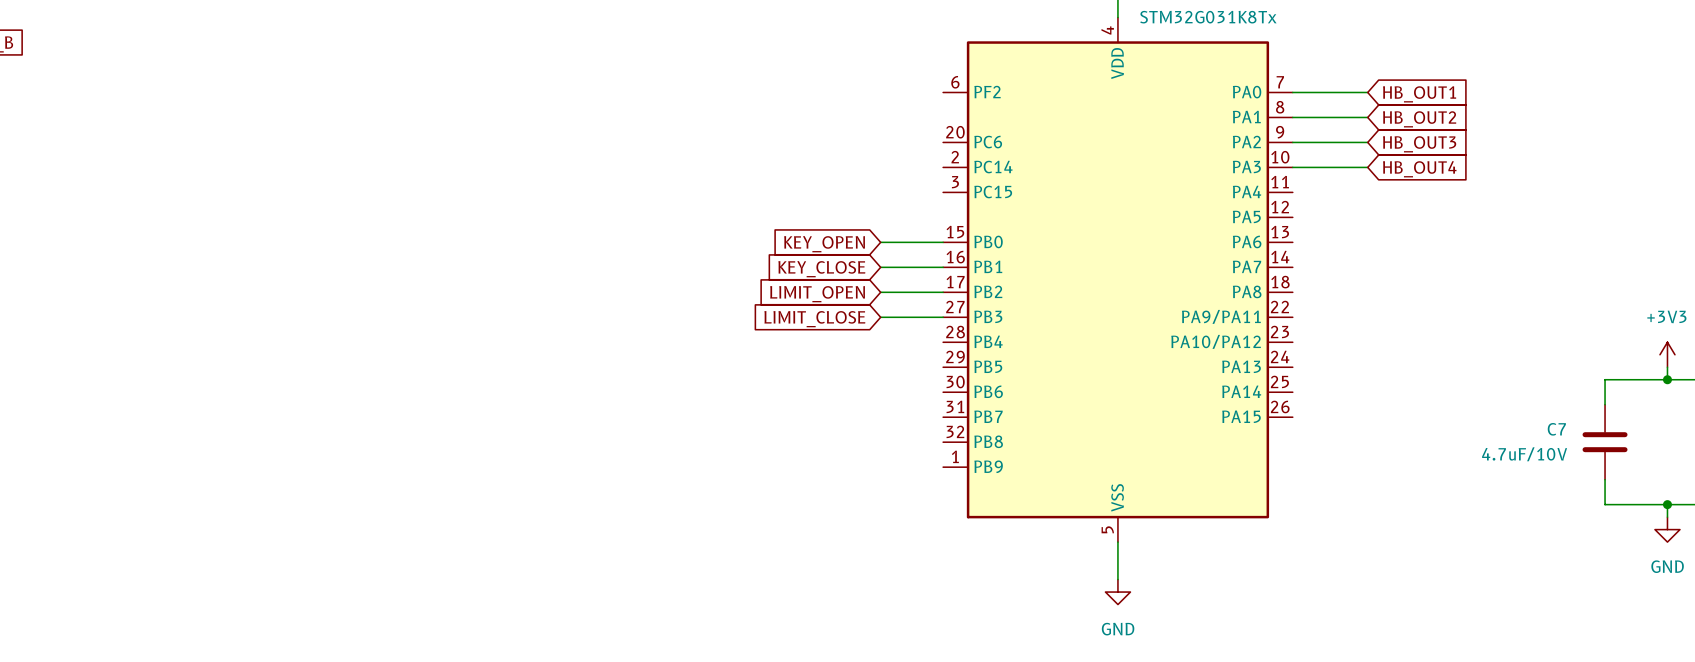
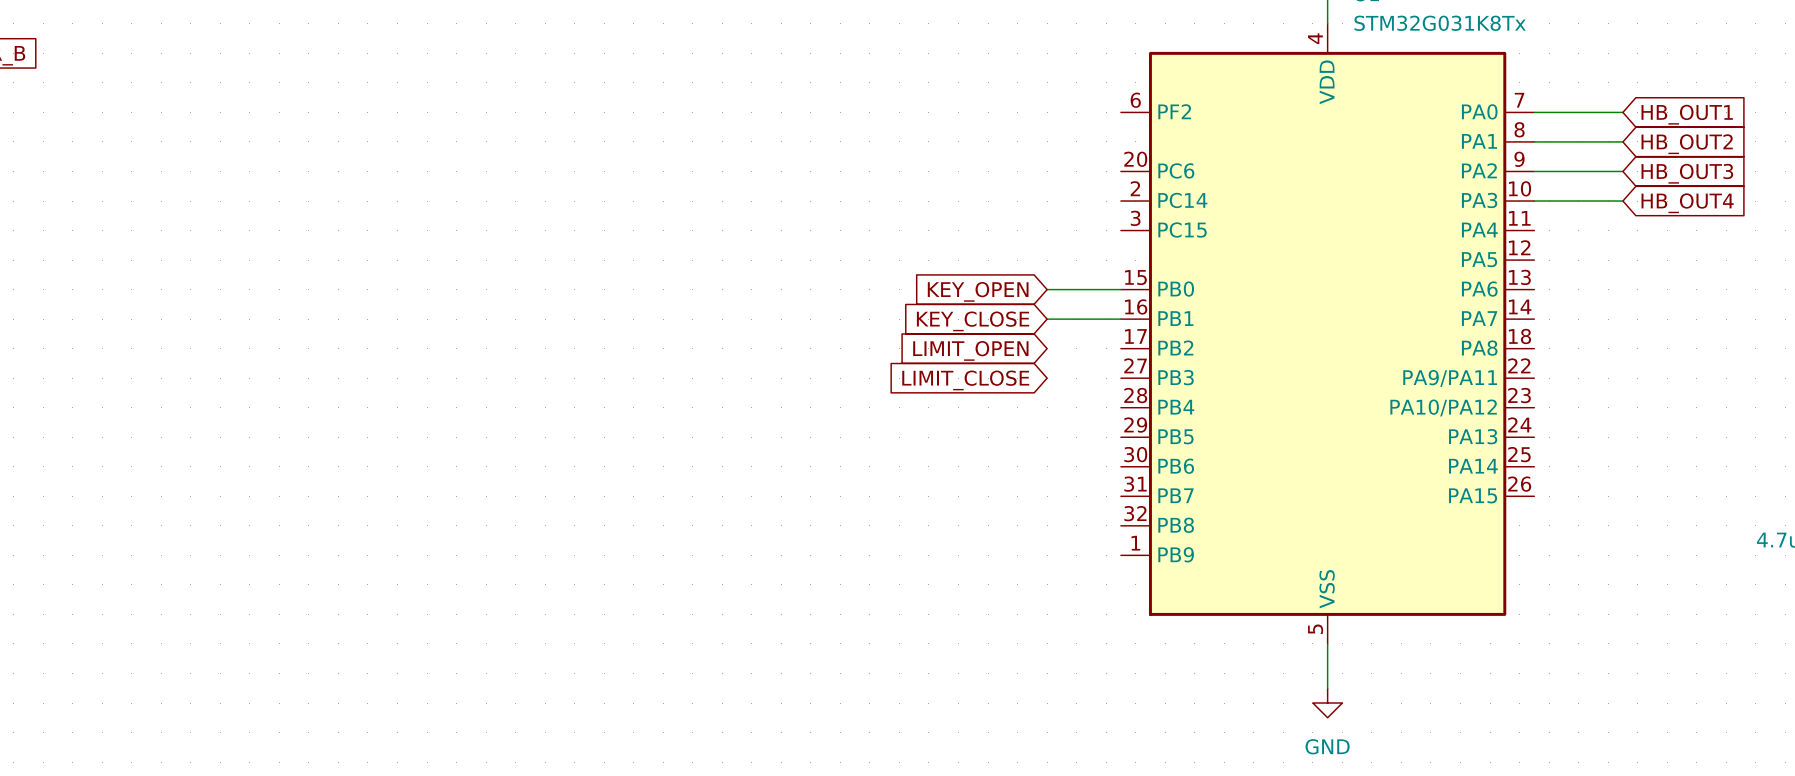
wire: (880, 292) (943, 292) -> none
wire: (880, 317) (943, 317) -> none

